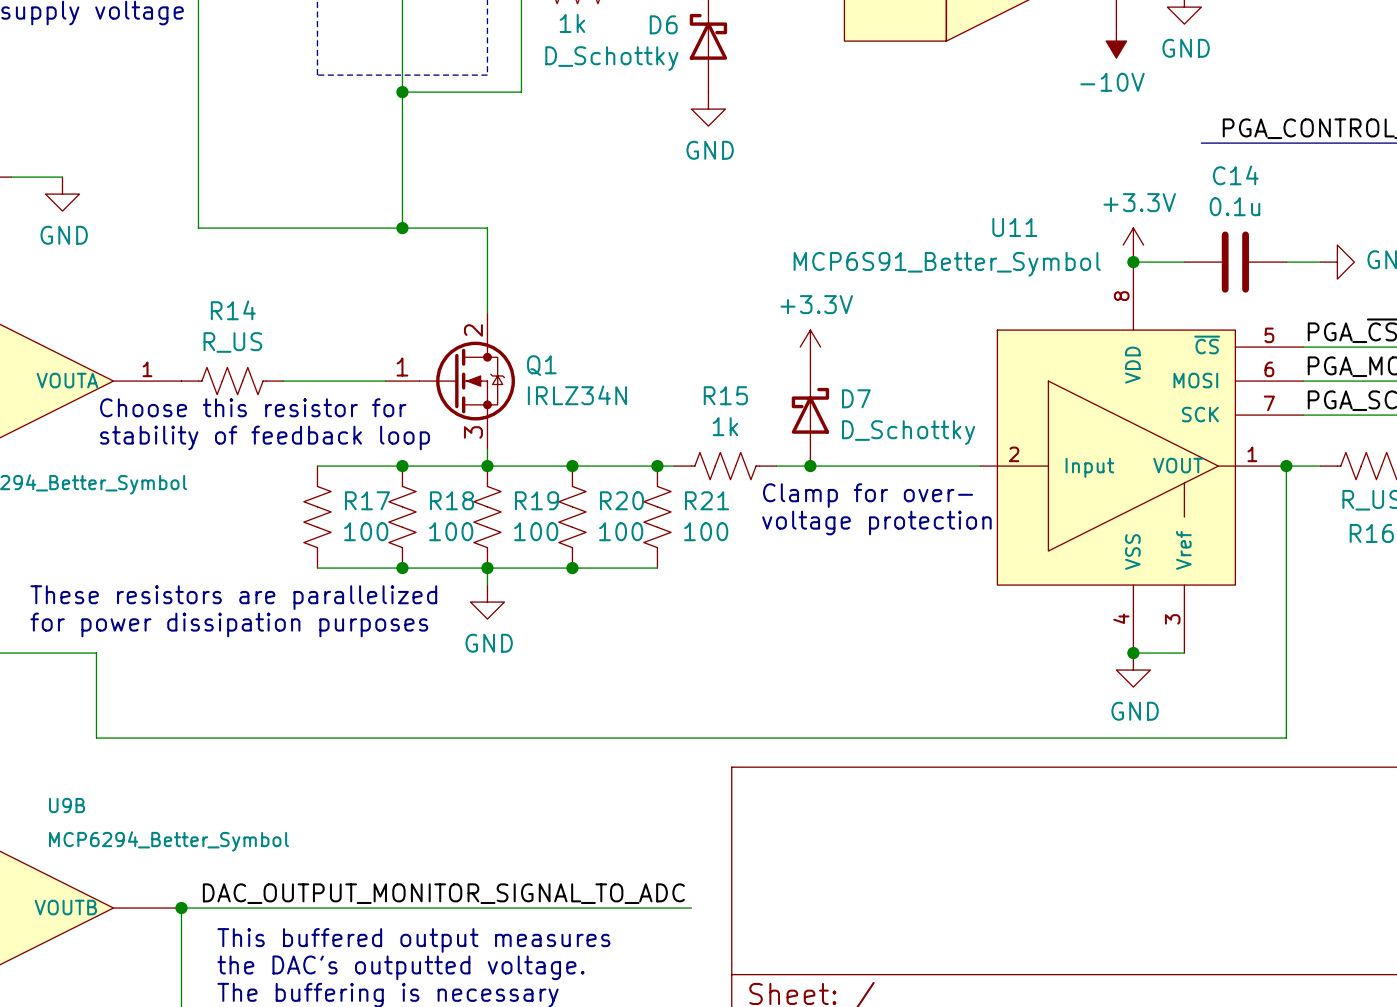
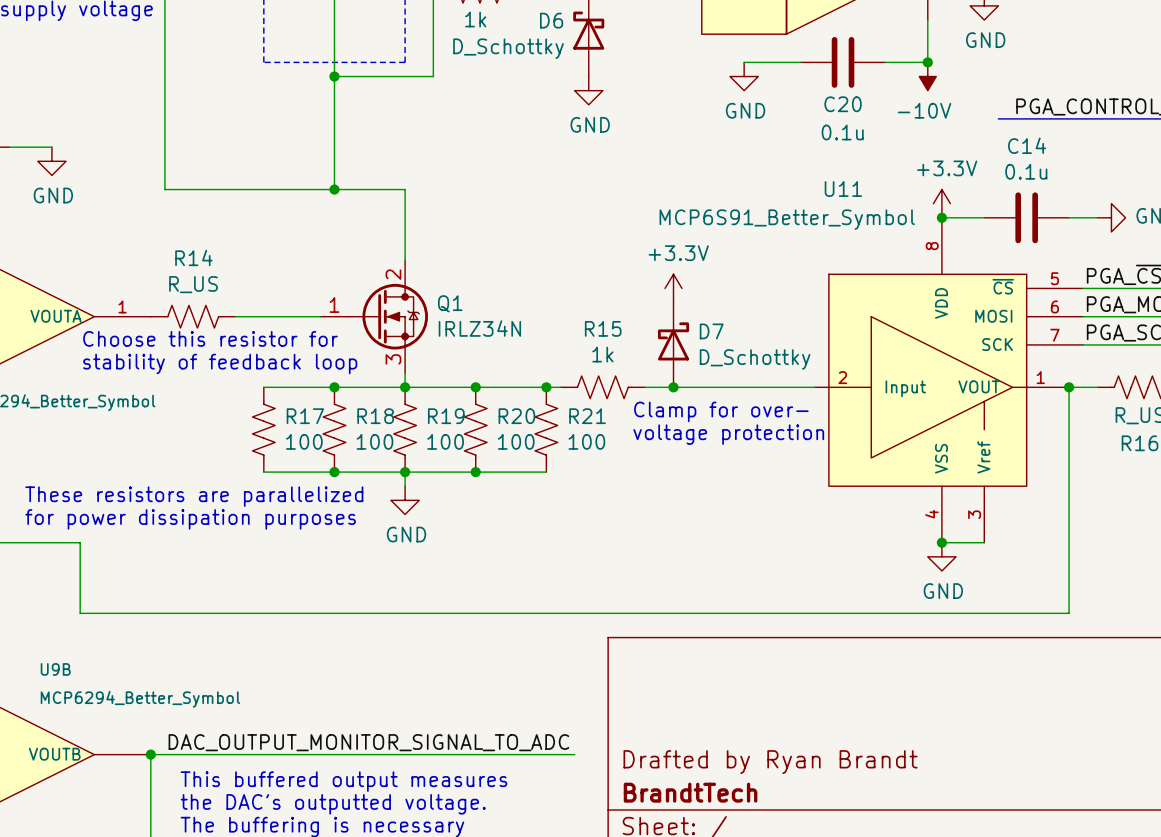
wire: none -> (927, 20) (927, 62) (885, 62)
power symbol position: -10V (1116, 41) -> -10V (927, 76)
wire: none -> (744, 62) (800, 62)
C20: none -> 0.1u (843, 62)
junction: none -> (927, 62)
power symbol: none -> GND (744, 76)
title block: none -> Drafted by Ryan Brandt (770, 762)
title block: none -> BrandtTech (690, 792)

